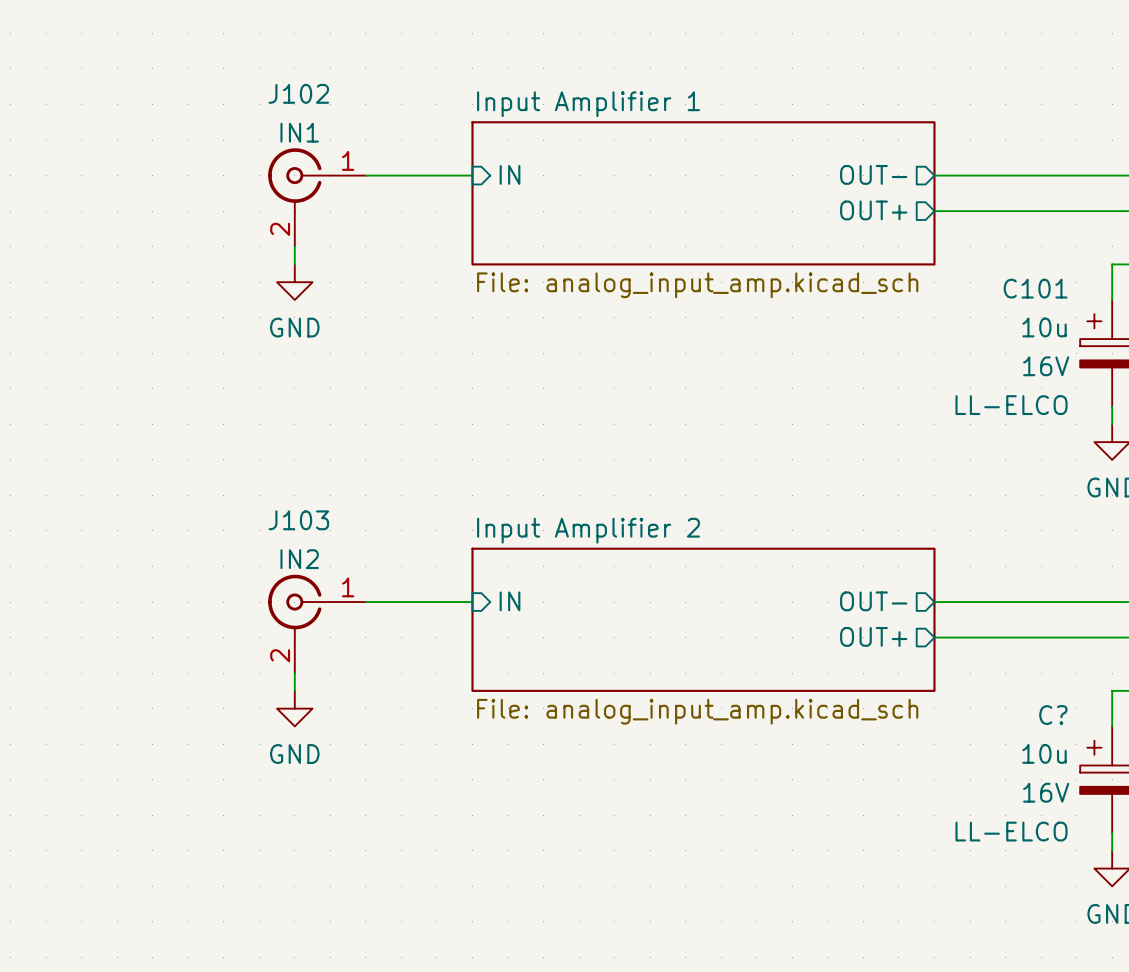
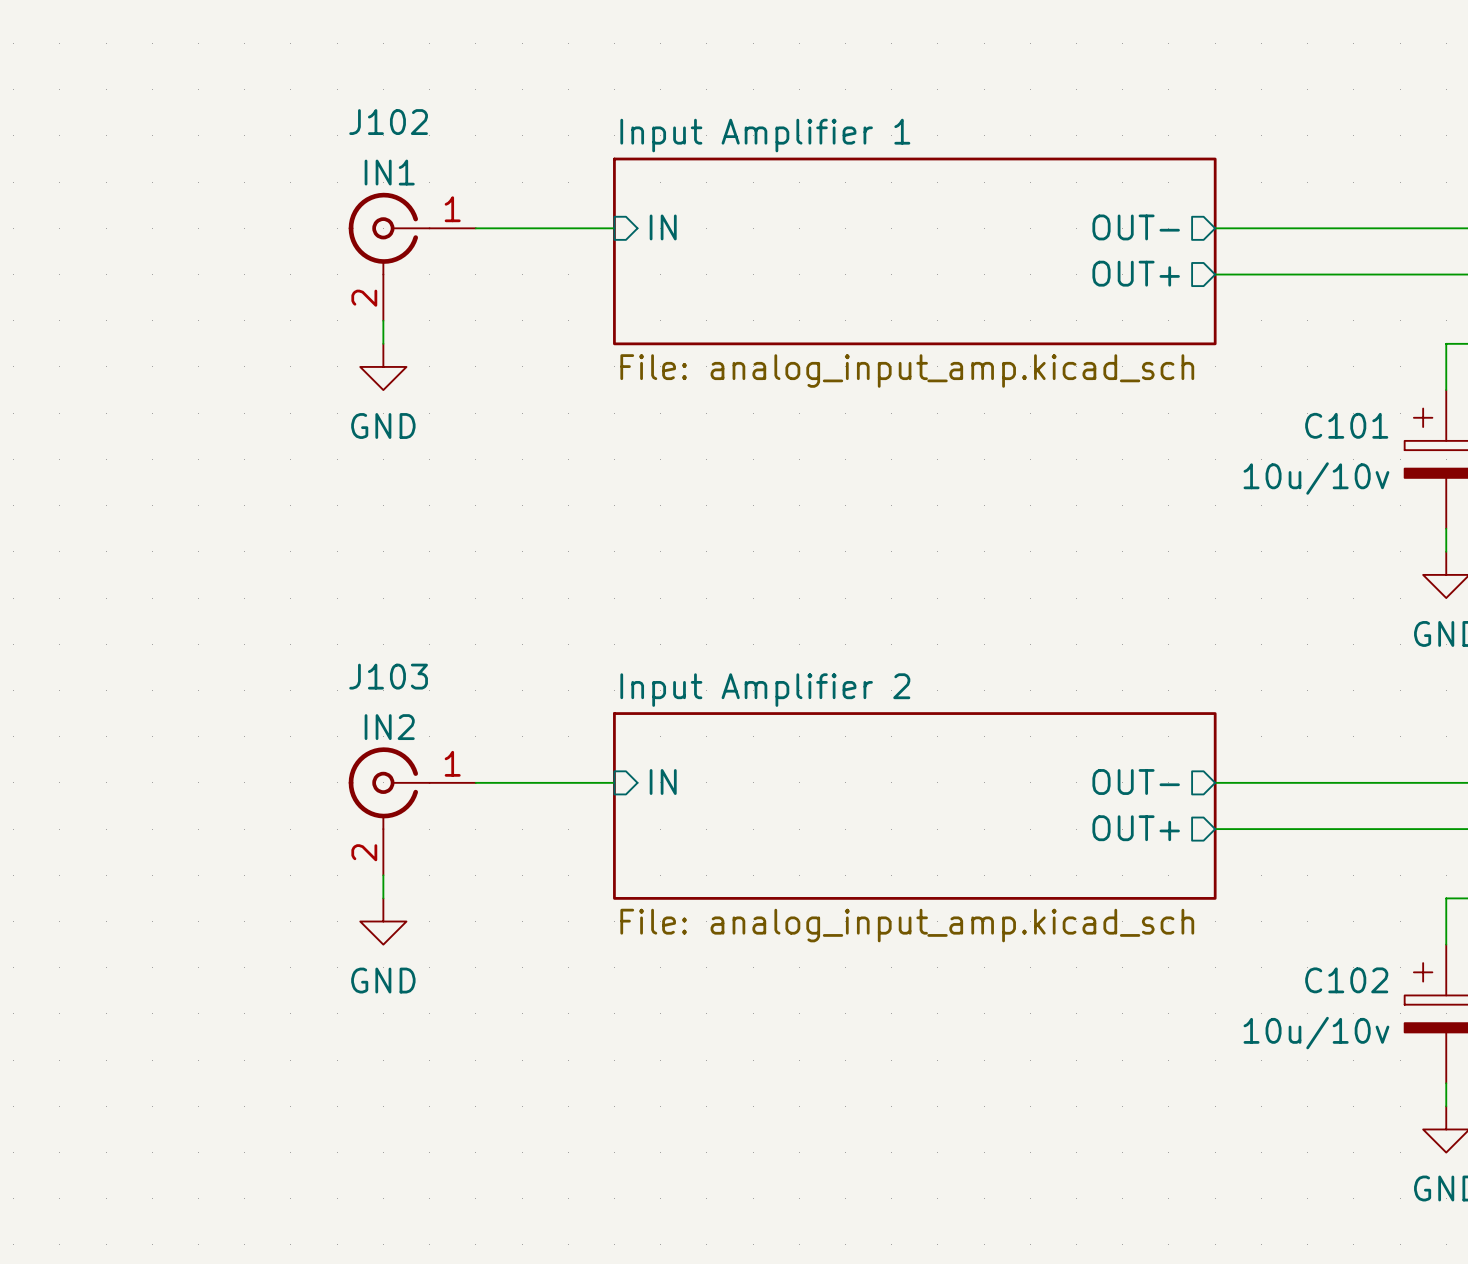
C101 name position: C101 (1035, 288) -> C101 (1346, 425)
C101 value: 10u (1044, 327) -> 10u/10v (1316, 478)
C101 text: 16V (1046, 366) -> none
C101 text: LL-ELCO (1011, 405) -> none
C? name: C? (1053, 715) -> C102 (1346, 980)
C? value: 10u (1044, 753) -> 10u/10v (1316, 1033)
C? text: 16V (1046, 792) -> none
C? text: LL-ELCO (1011, 831) -> none

